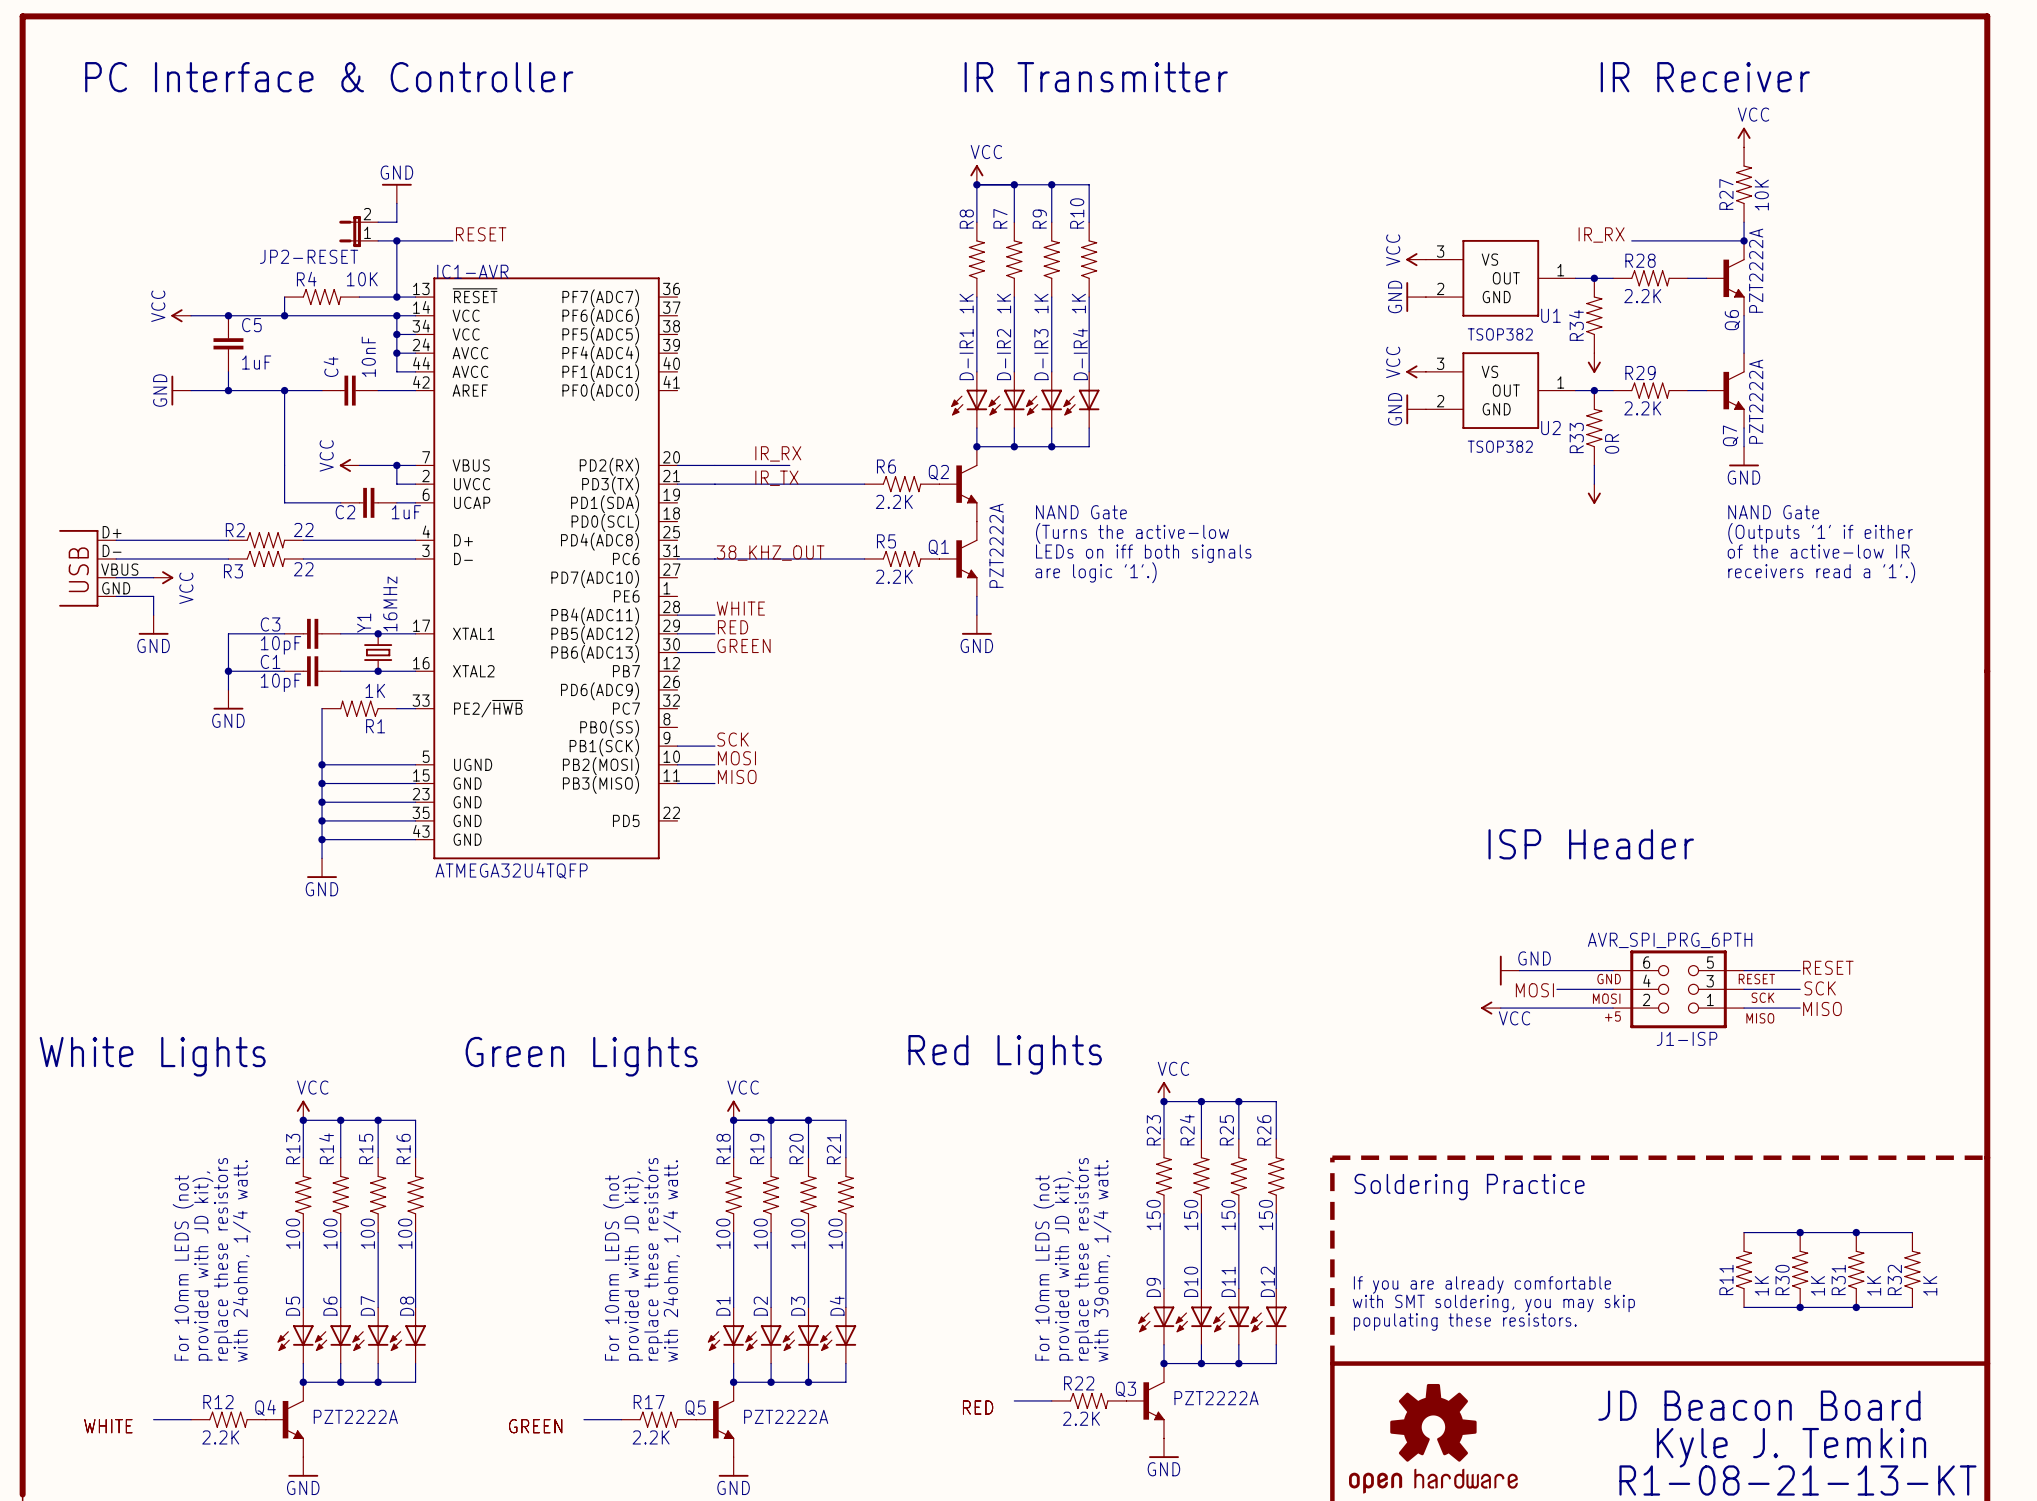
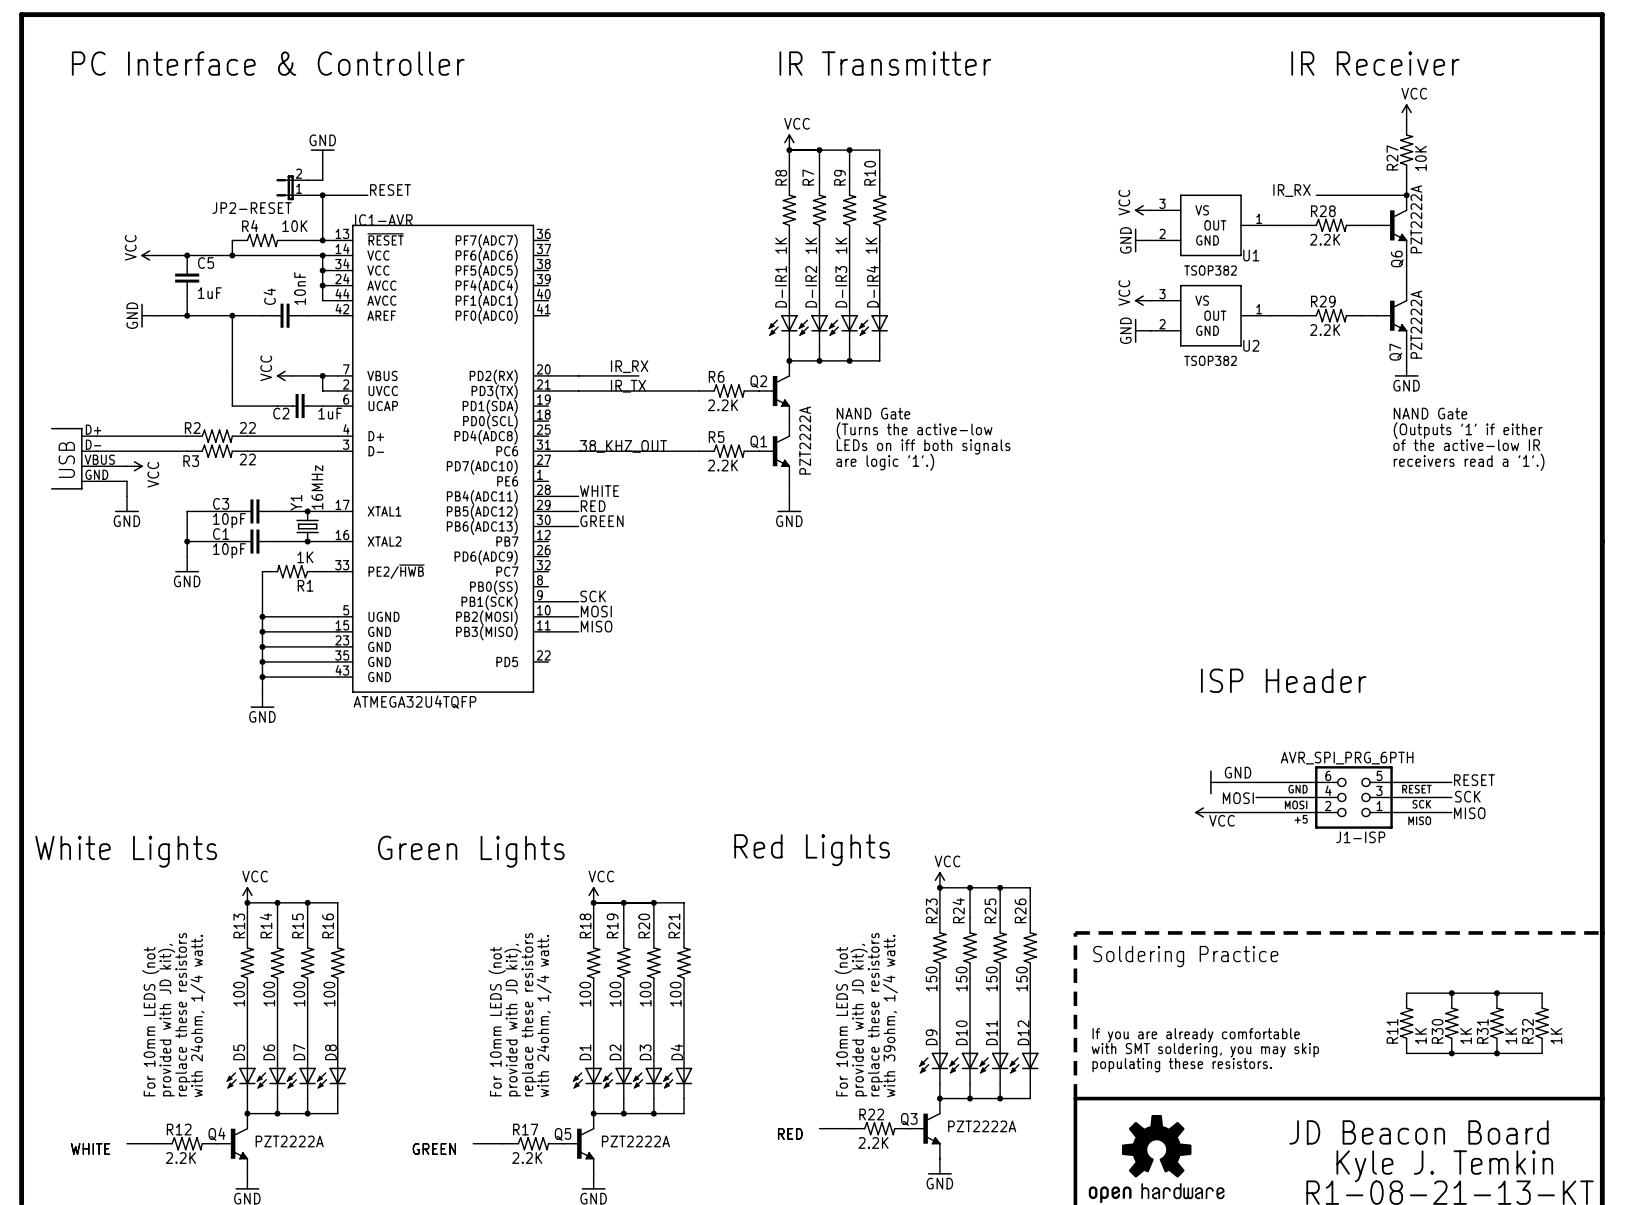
junction: (1594, 278) -> none
R34: (1594, 315) -> none
power symbol: (1594, 362) -> none
junction: (1594, 390) -> none
R33: 0R (1594, 428) -> none
wire: (1594, 465) (1594, 484) -> none
power symbol: (1594, 493) -> none

